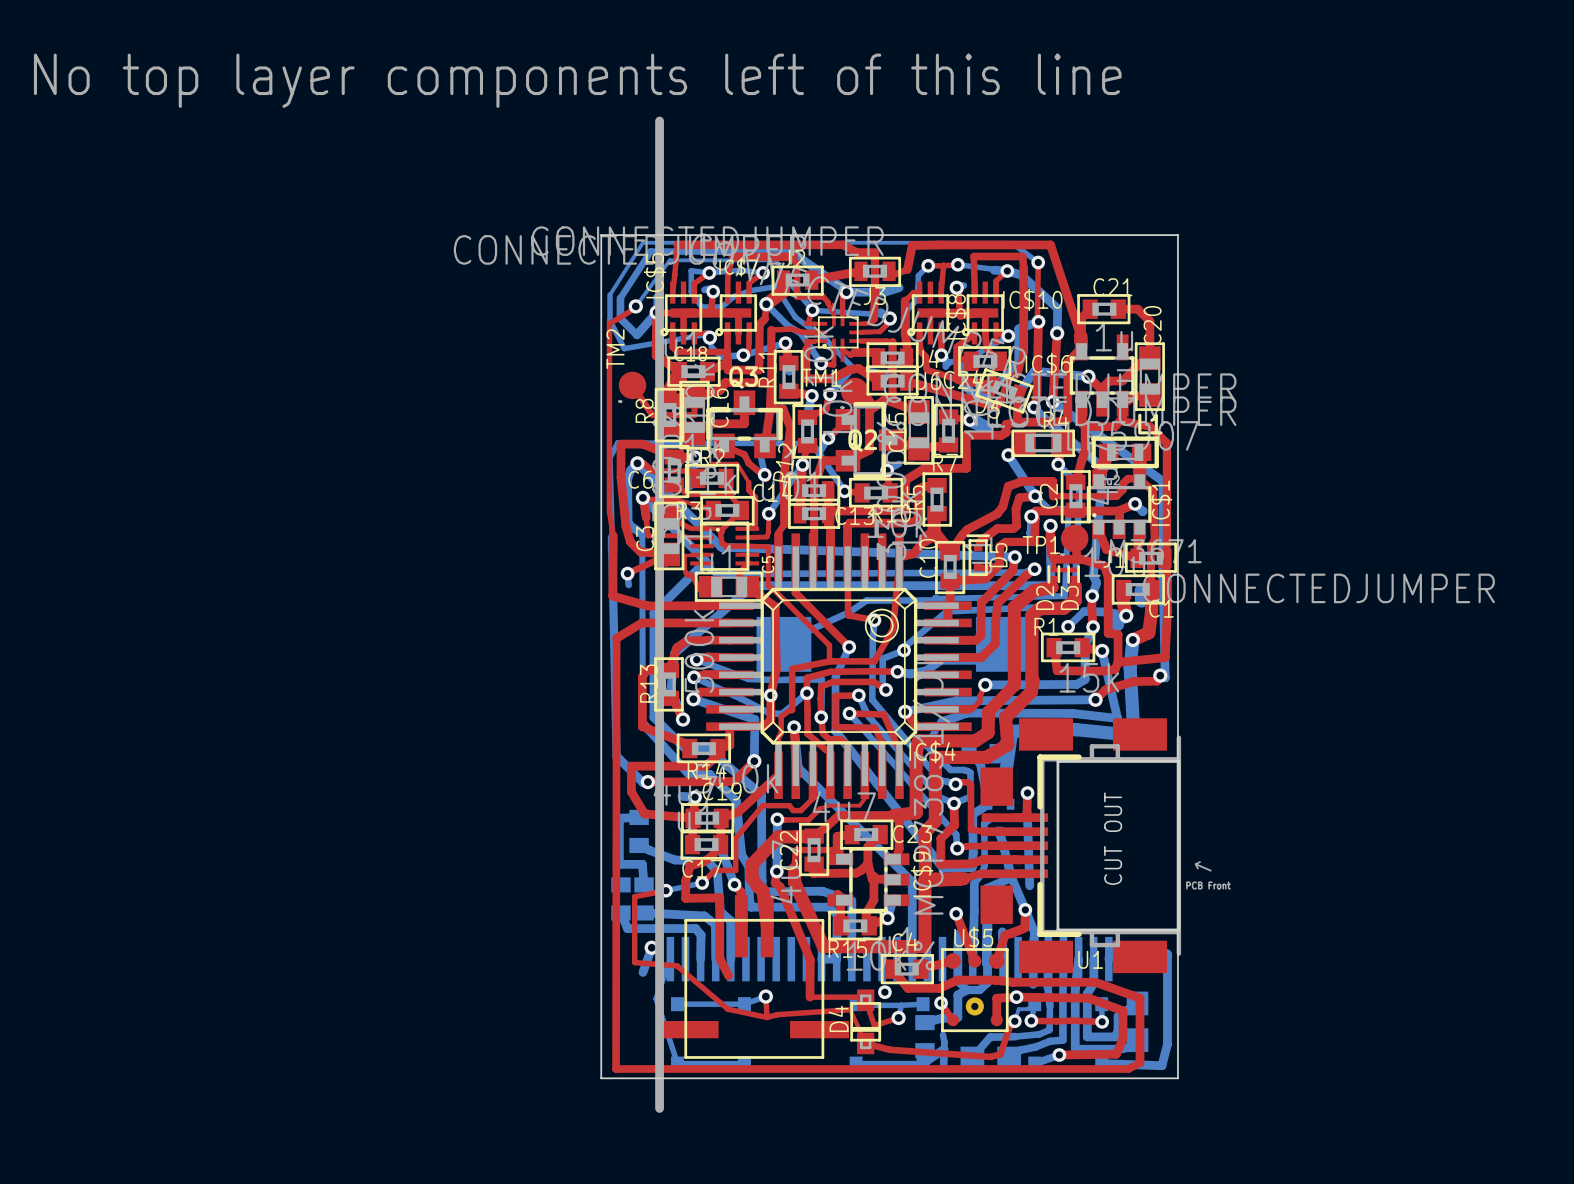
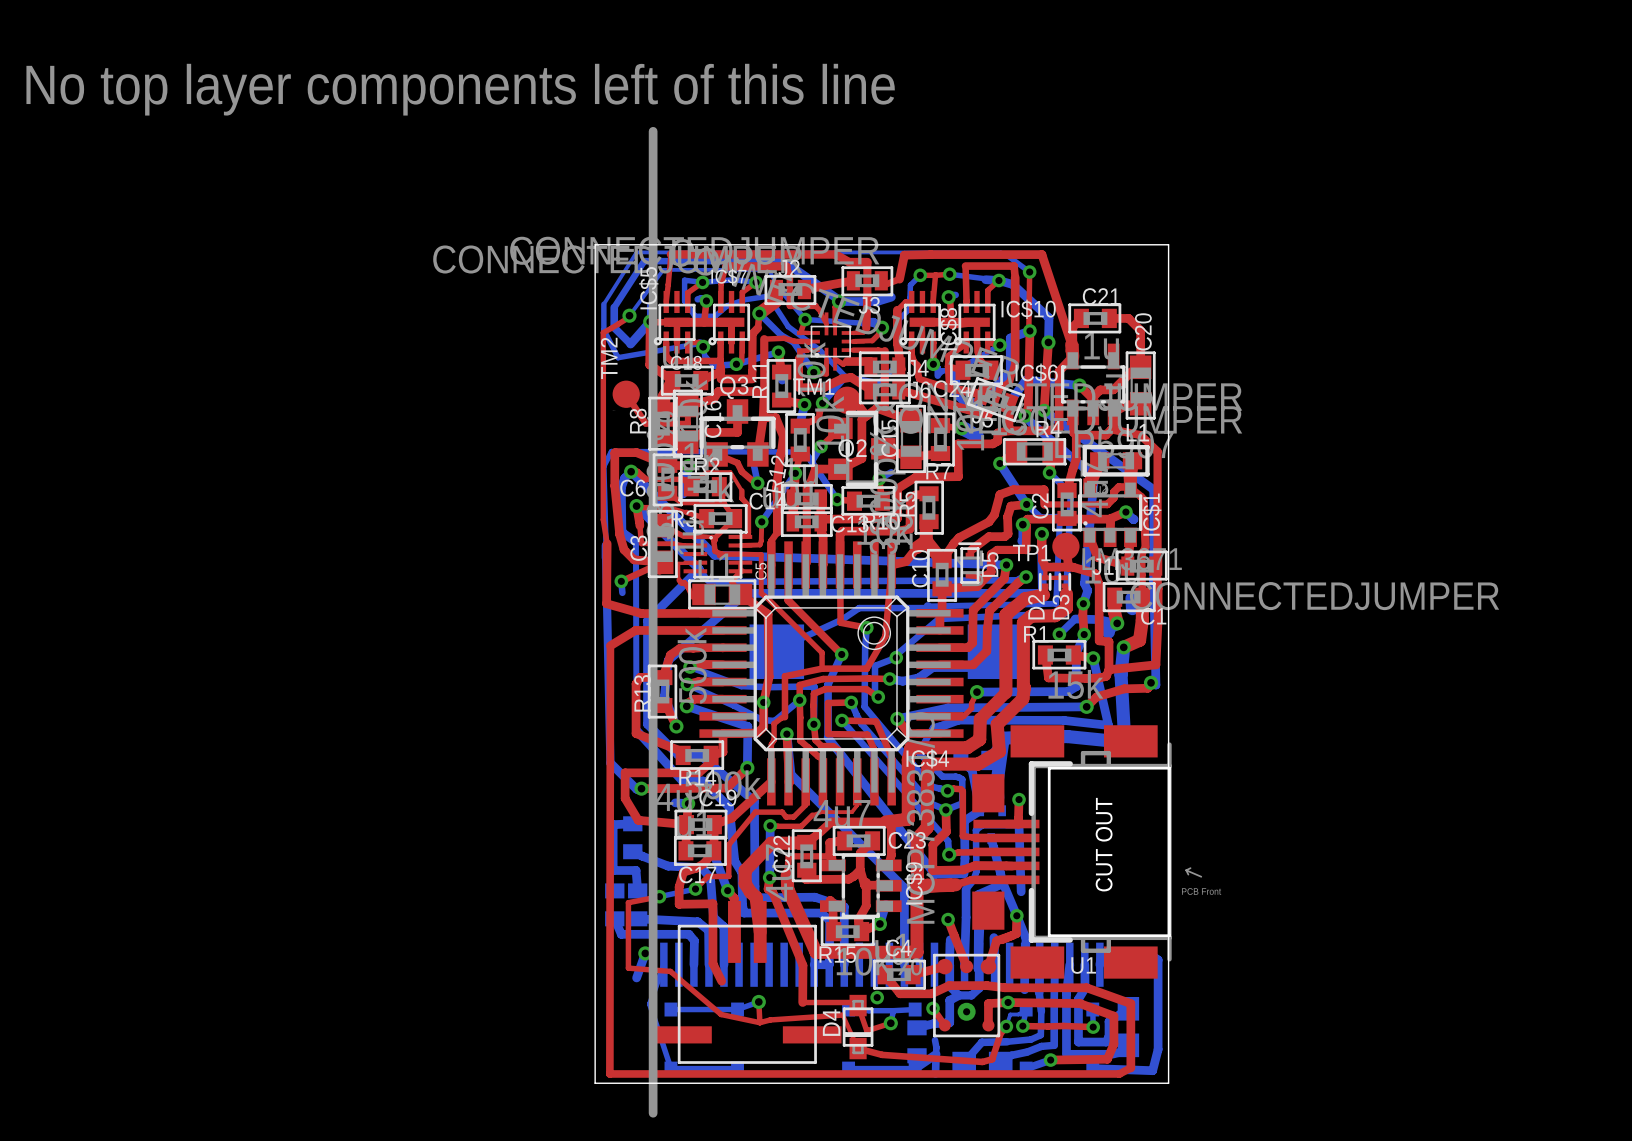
U$5 name: U$5 (973, 937) -> none

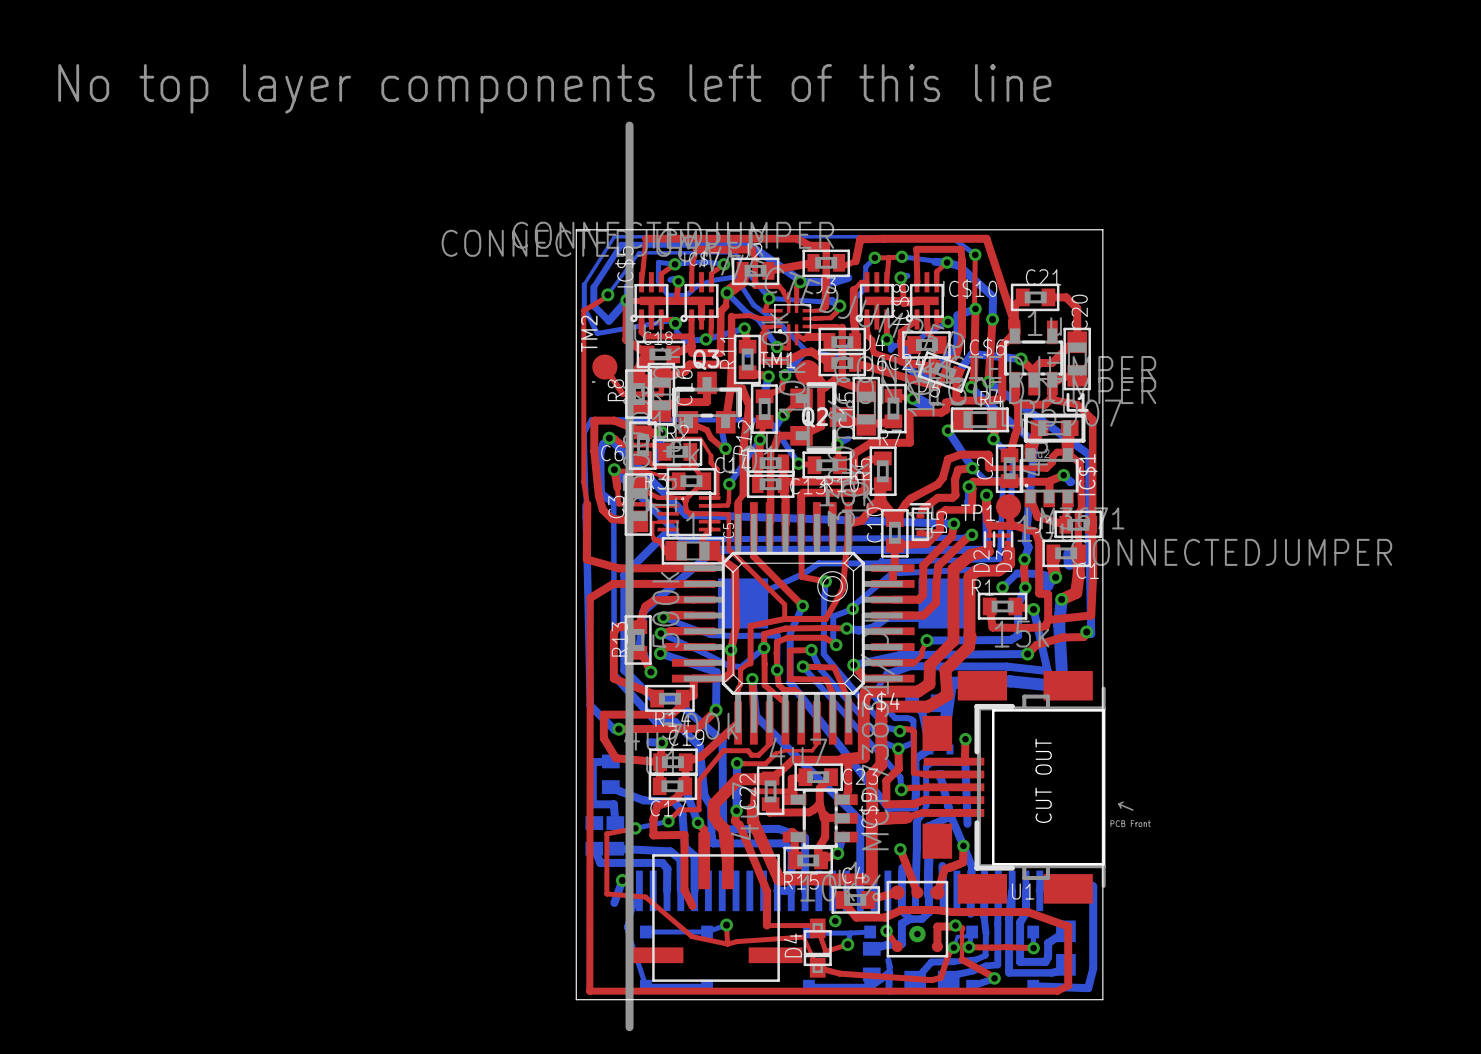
top track: (662, 562) (621, 581) -> none
bottom track: (621, 581) (622, 592) -> none
via: (621, 581) -> none
top track: (988, 1003) (1080, 1003) (1113, 1016) (1113, 1043) (1107, 1059) (1050, 1060) -> (937, 926) (961, 928) (961, 959) (995, 978)

